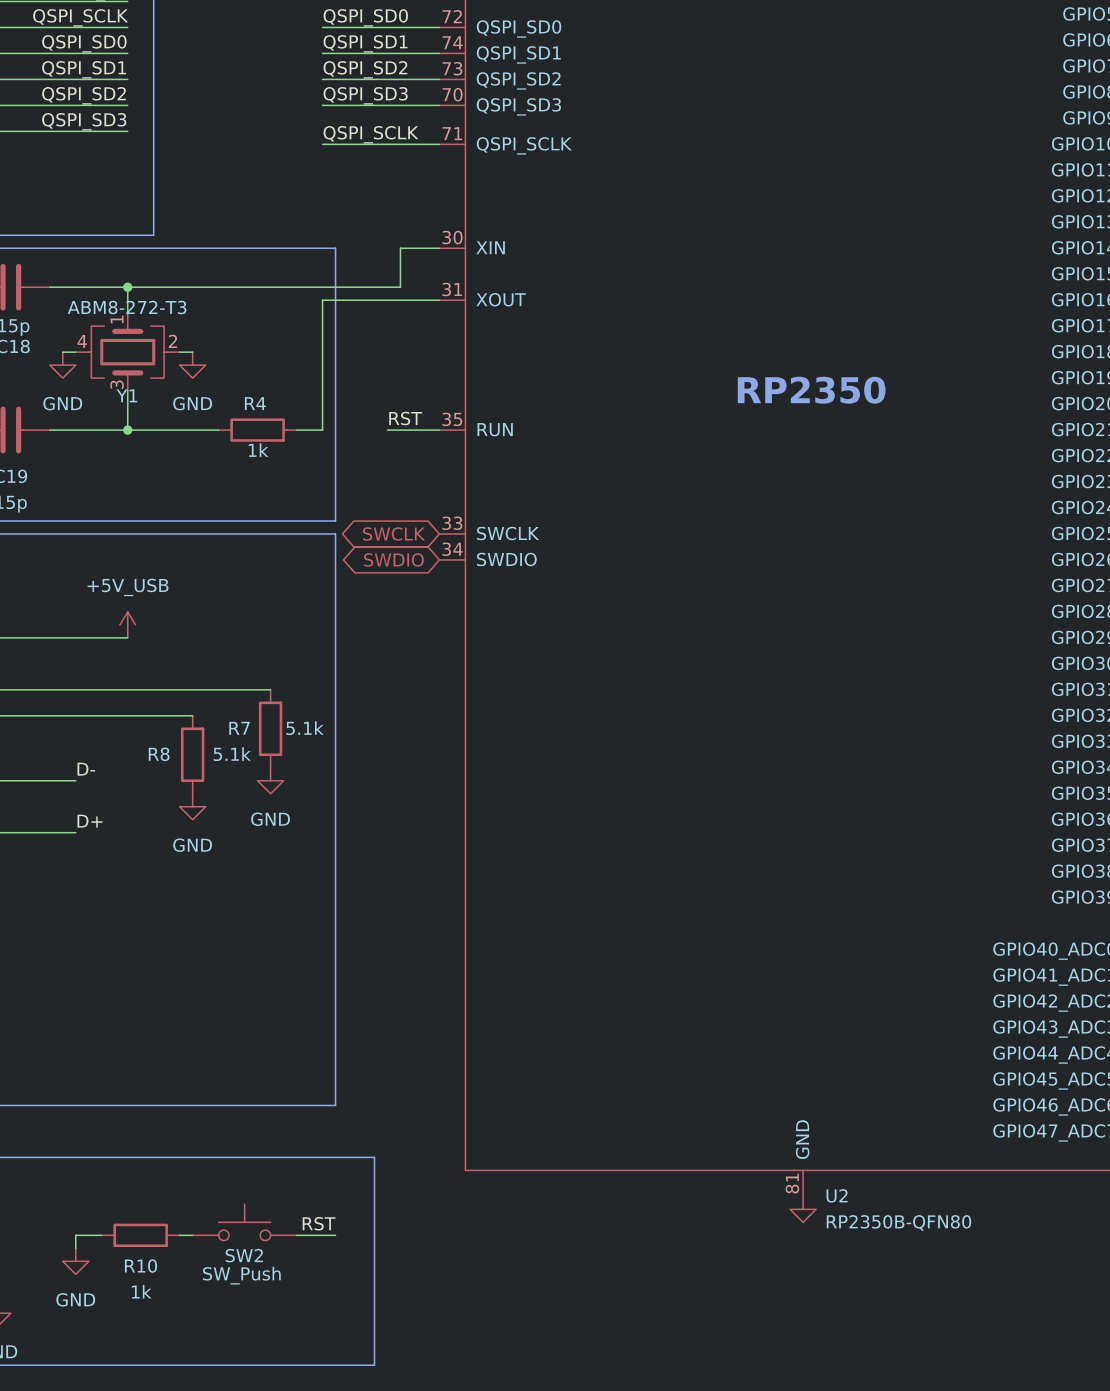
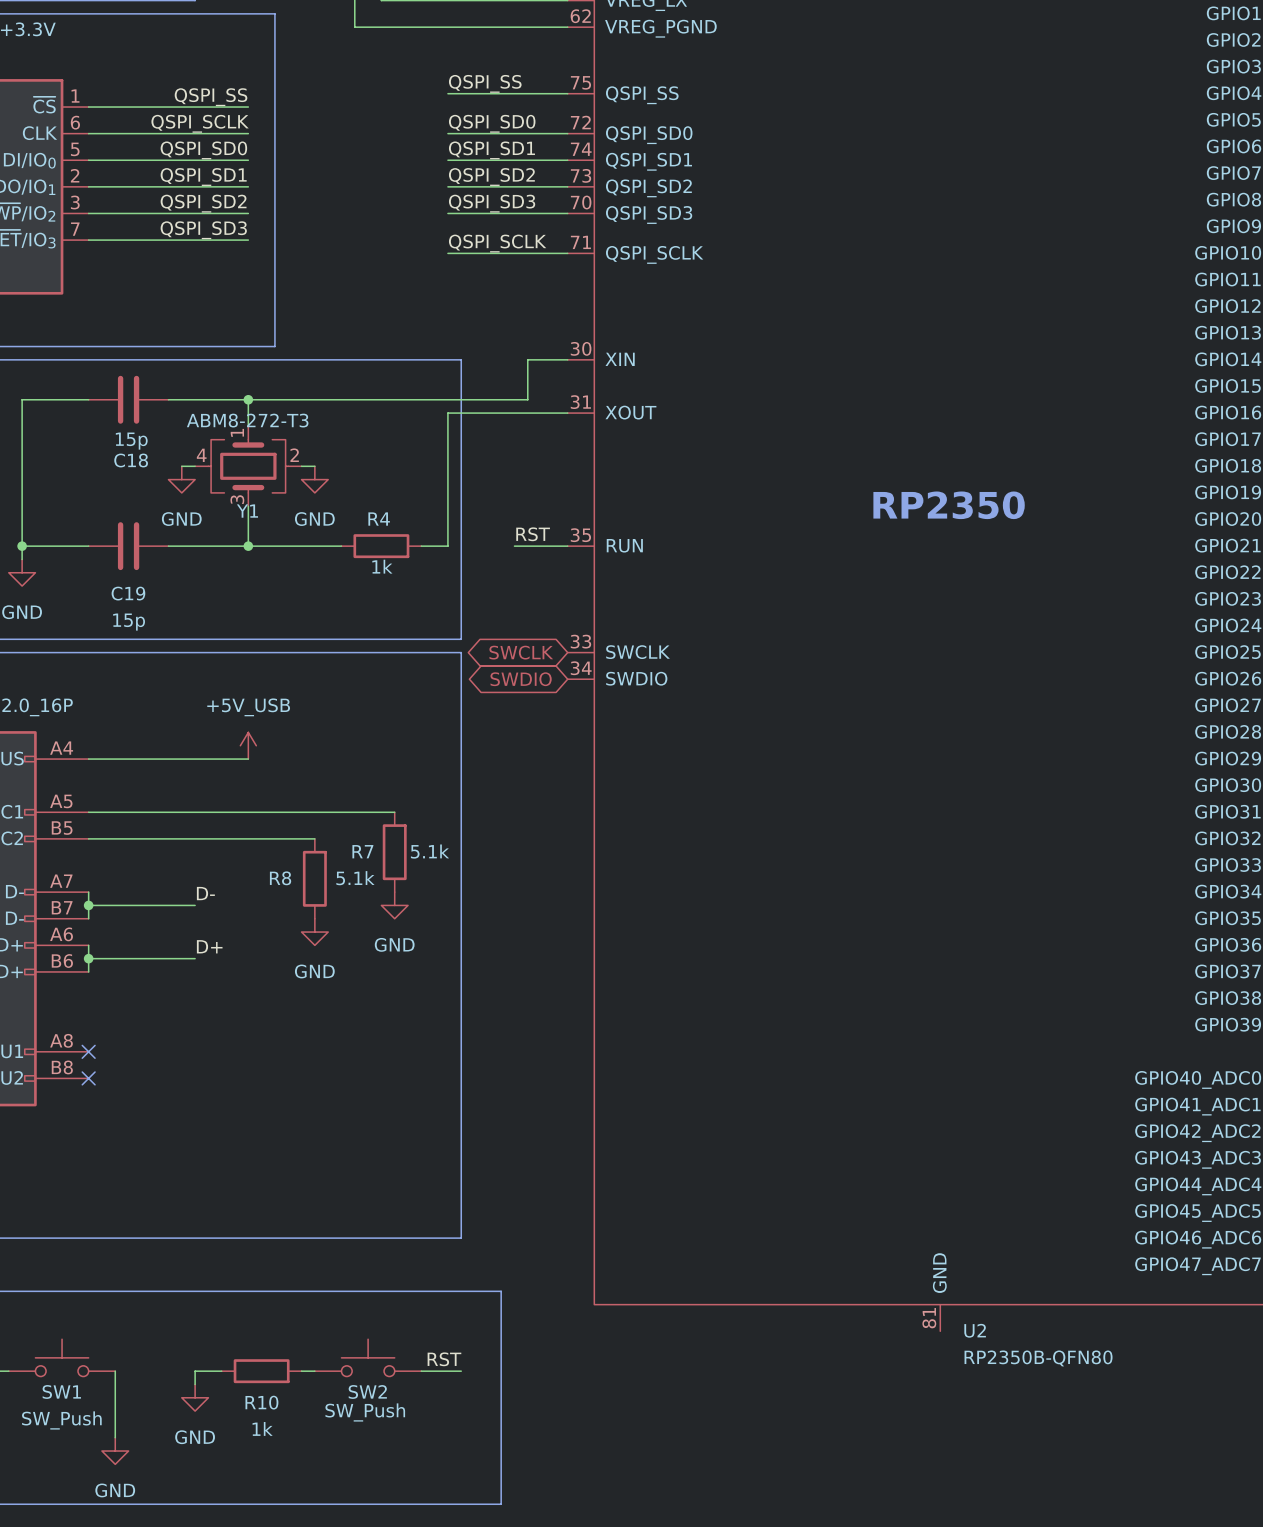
power symbol: (803, 1209) -> none

